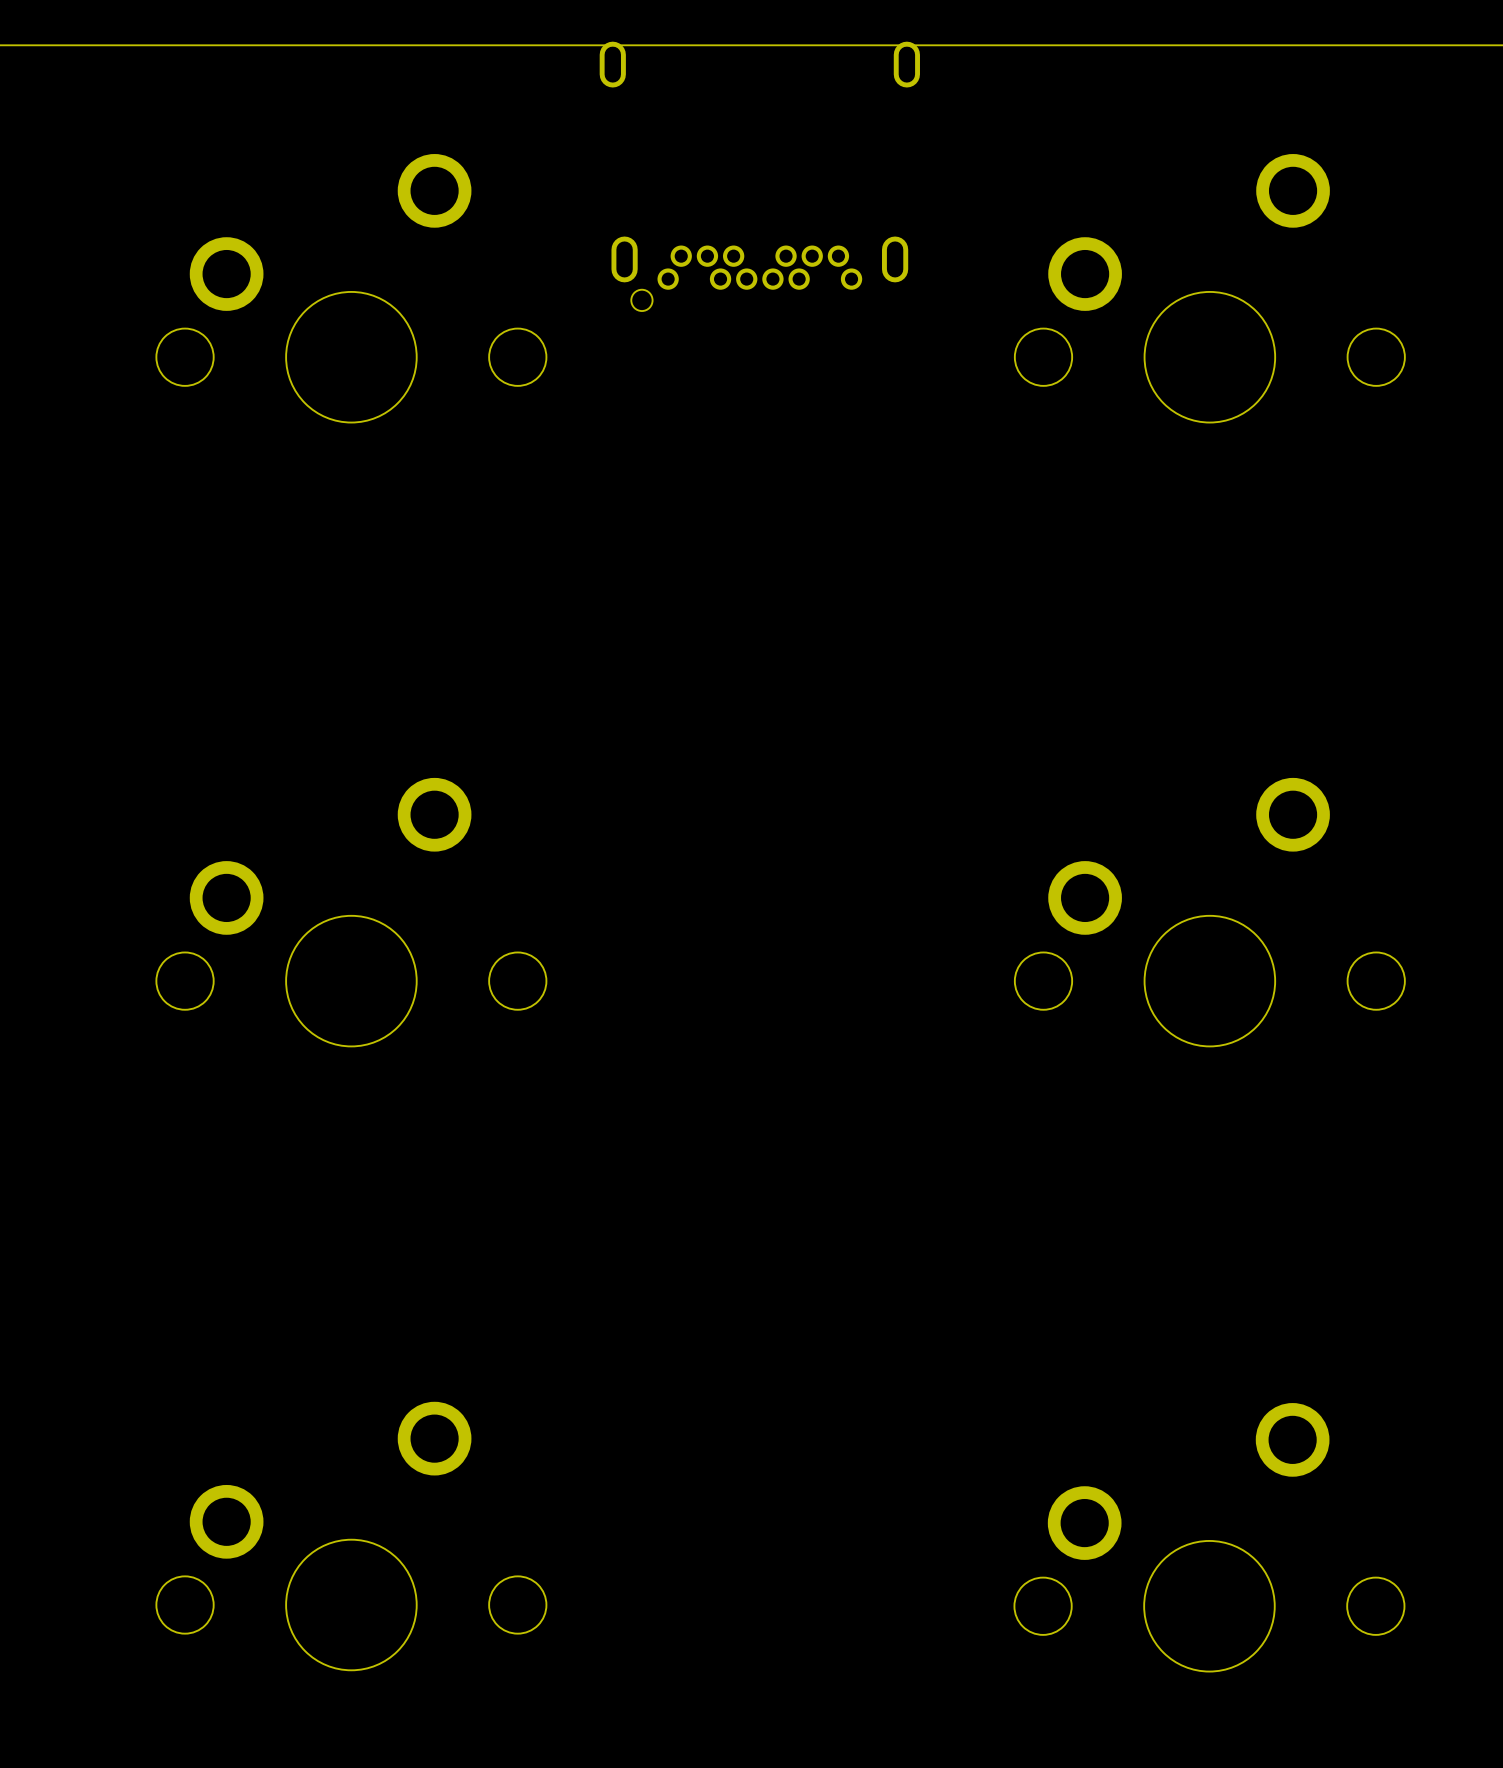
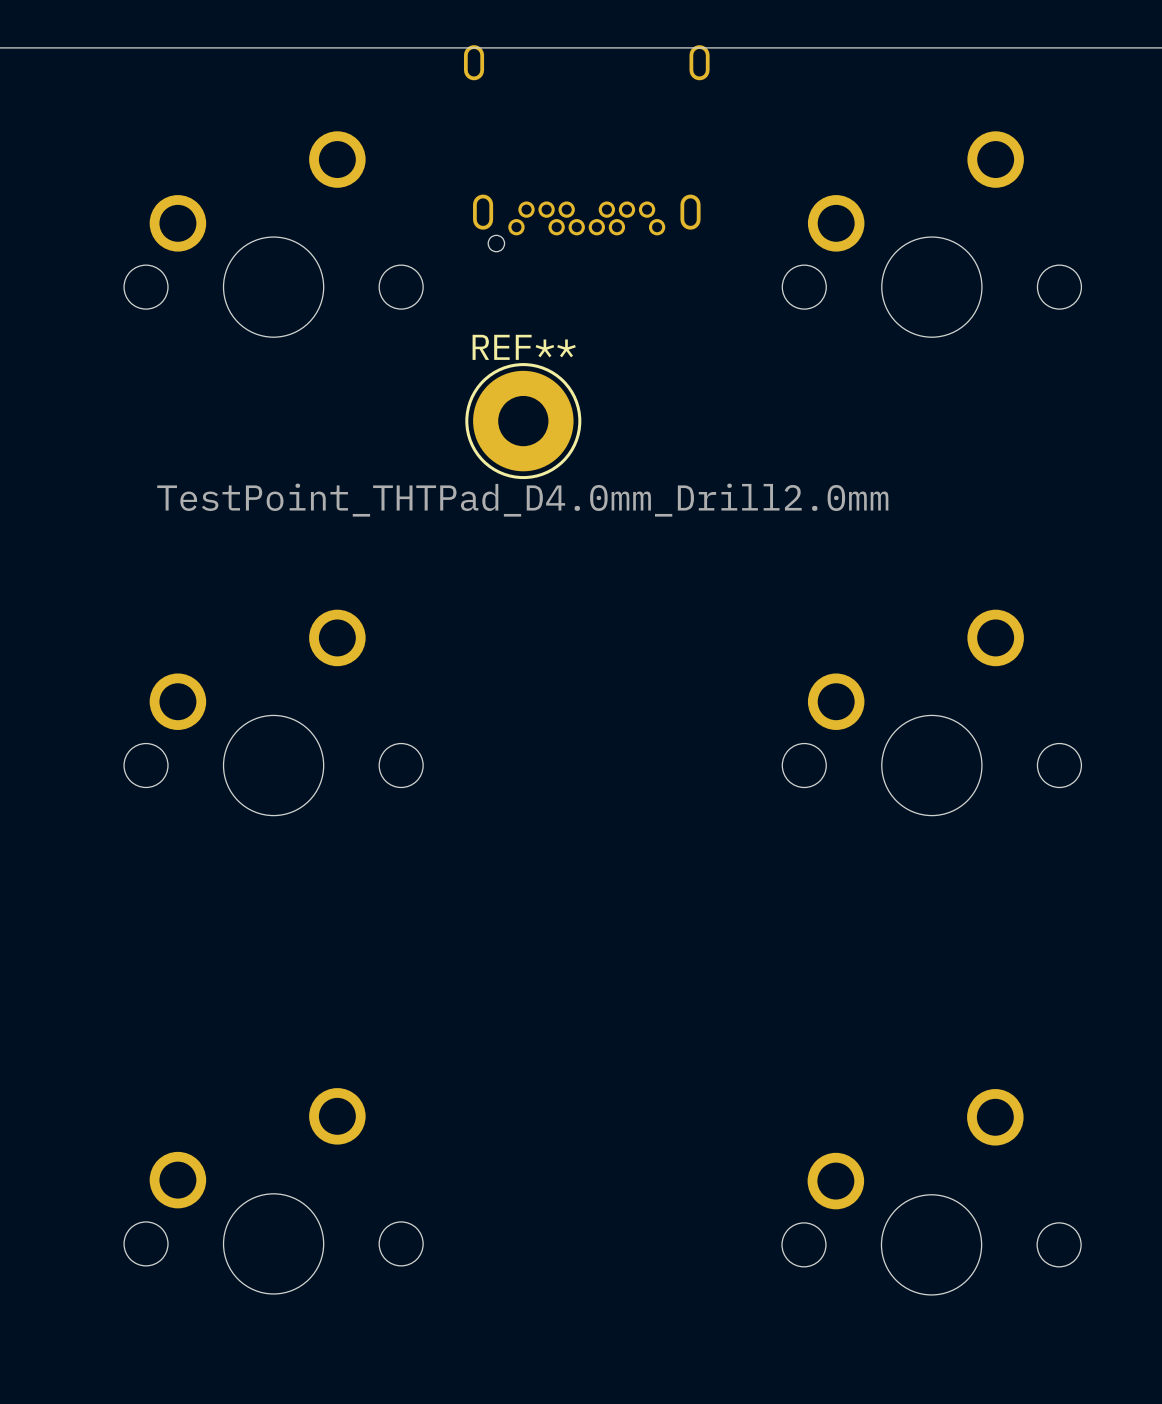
REF**: none -> TestPoint_THTPad_D4.0mm_Drill2.0mm (523, 421)

